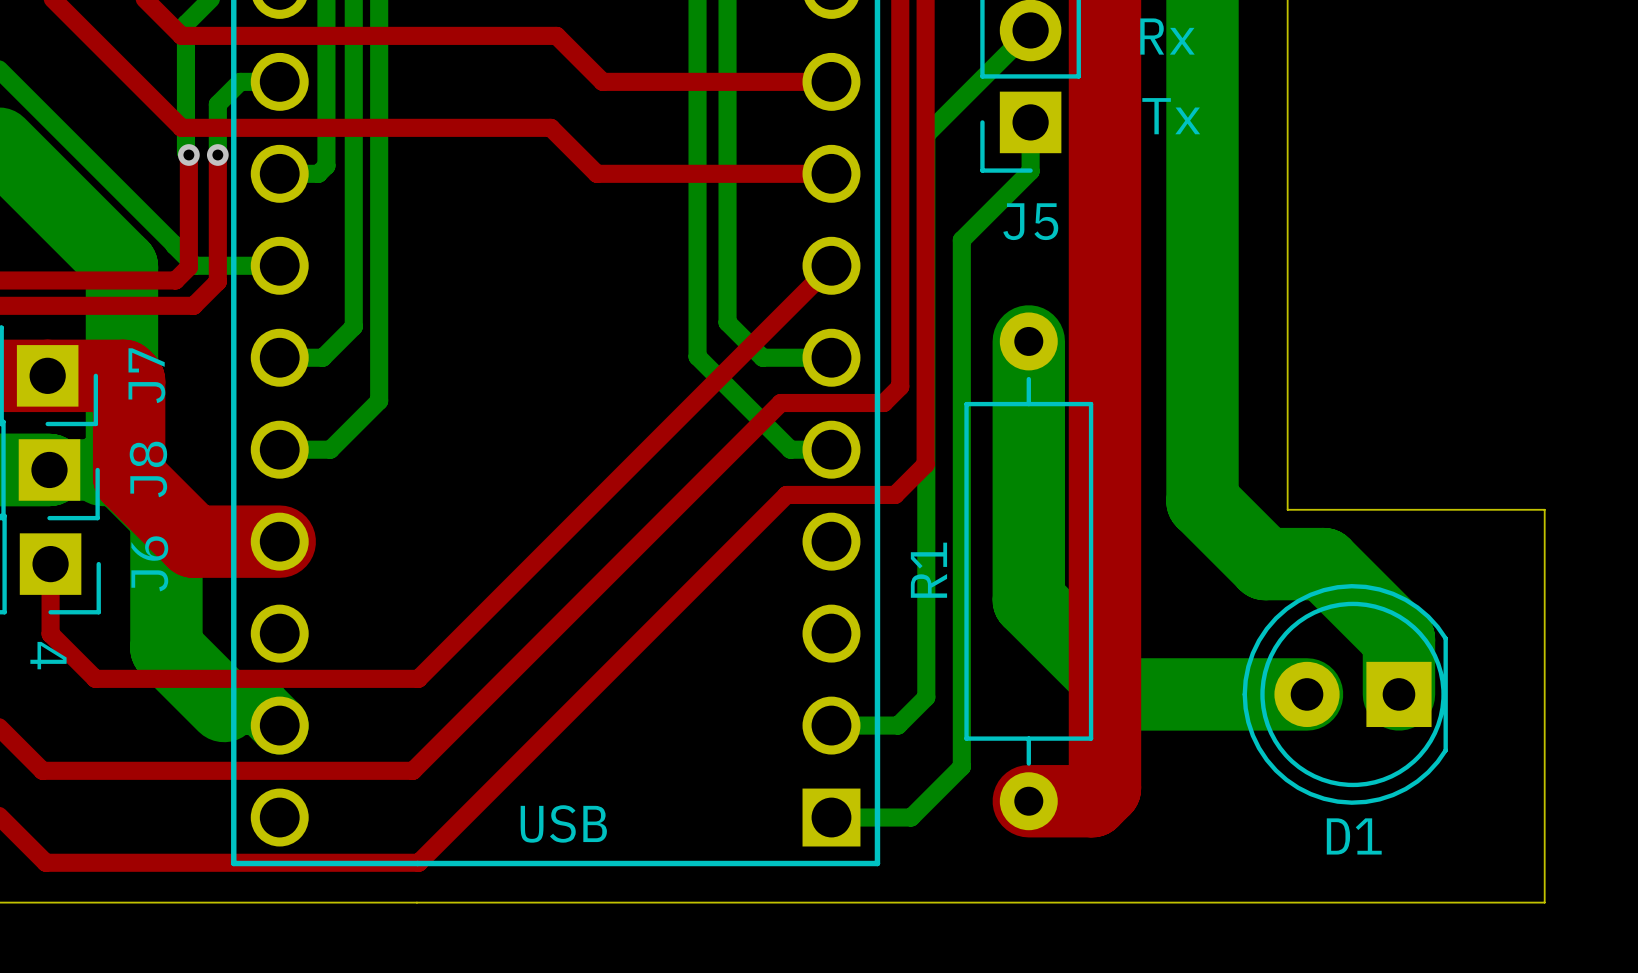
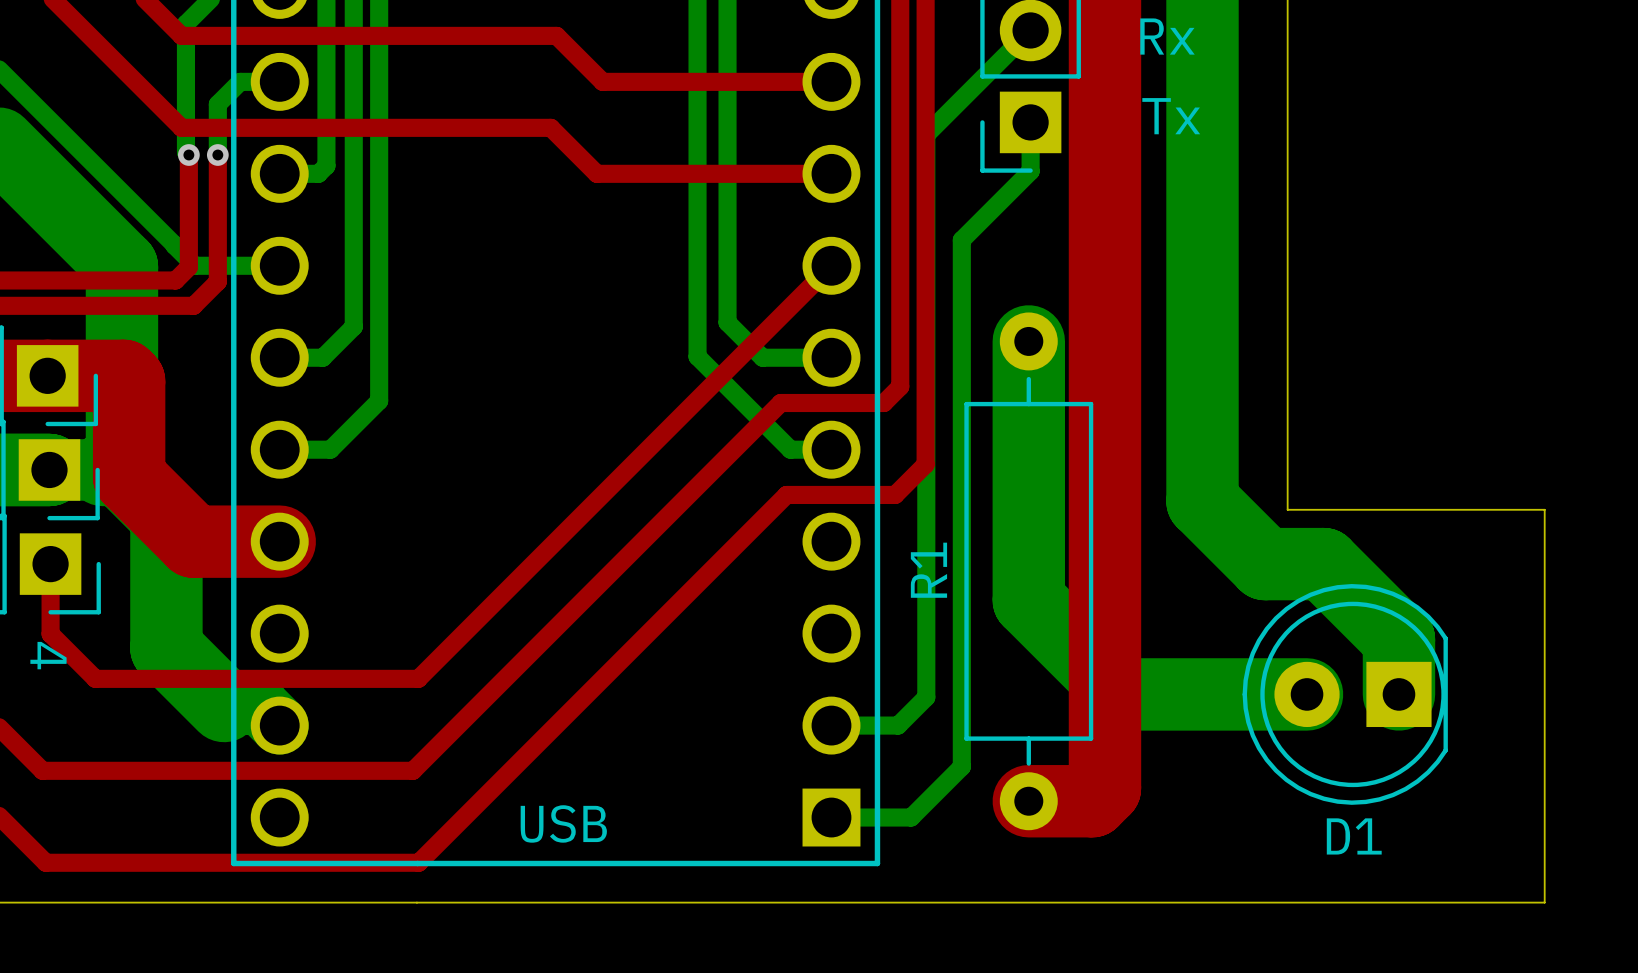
J5 name: J5 (1030, 221) -> none
J7 name: J7 (146, 375) -> none
J8 name: J8 (148, 469) -> none
J6 name: J6 (149, 563) -> none

